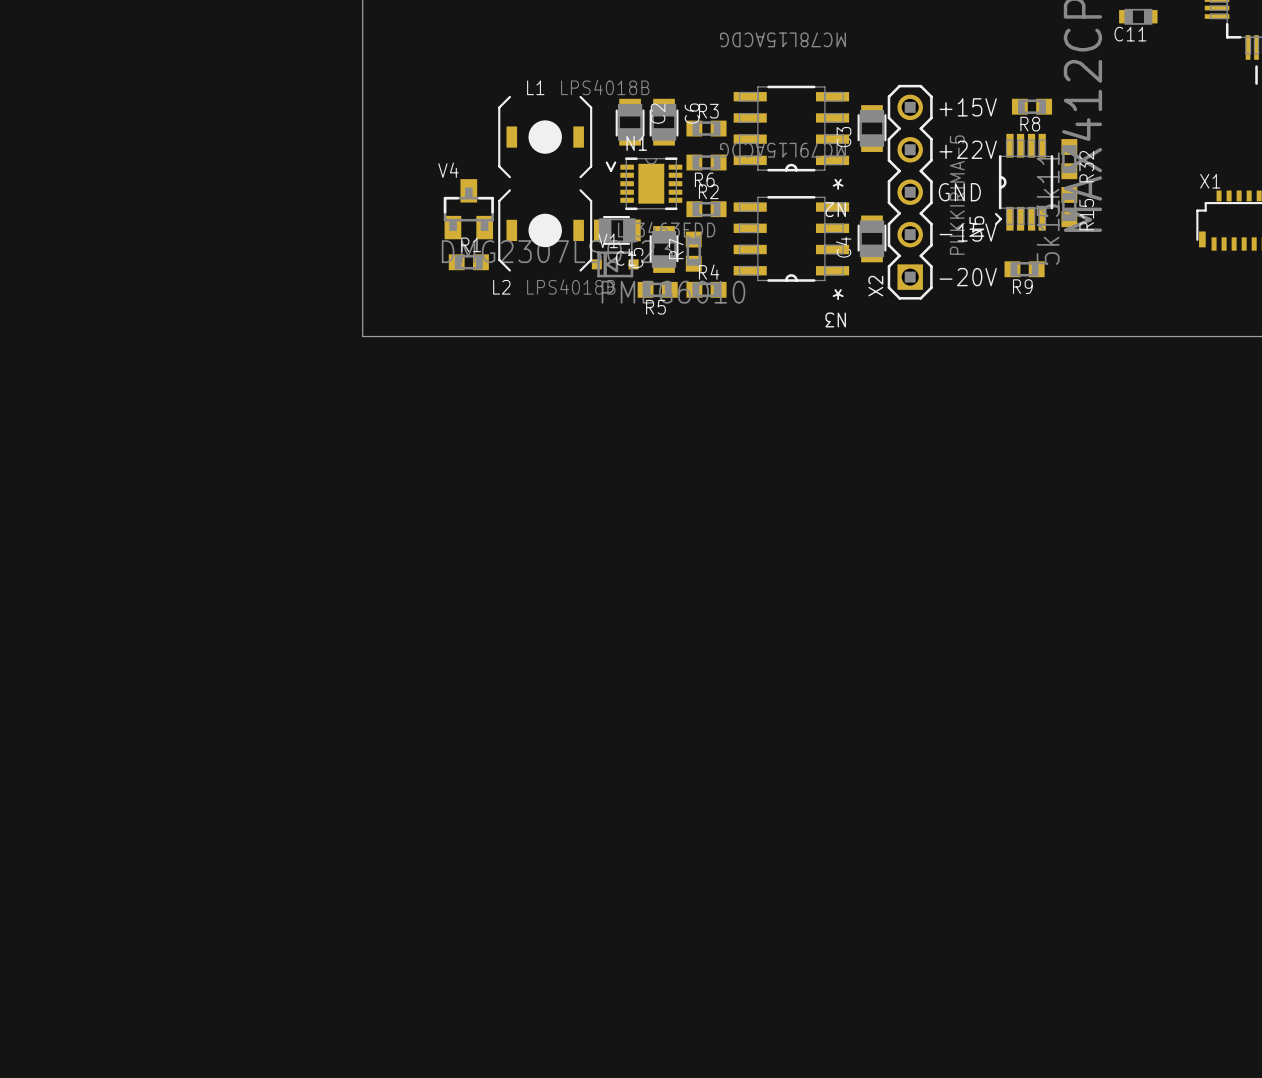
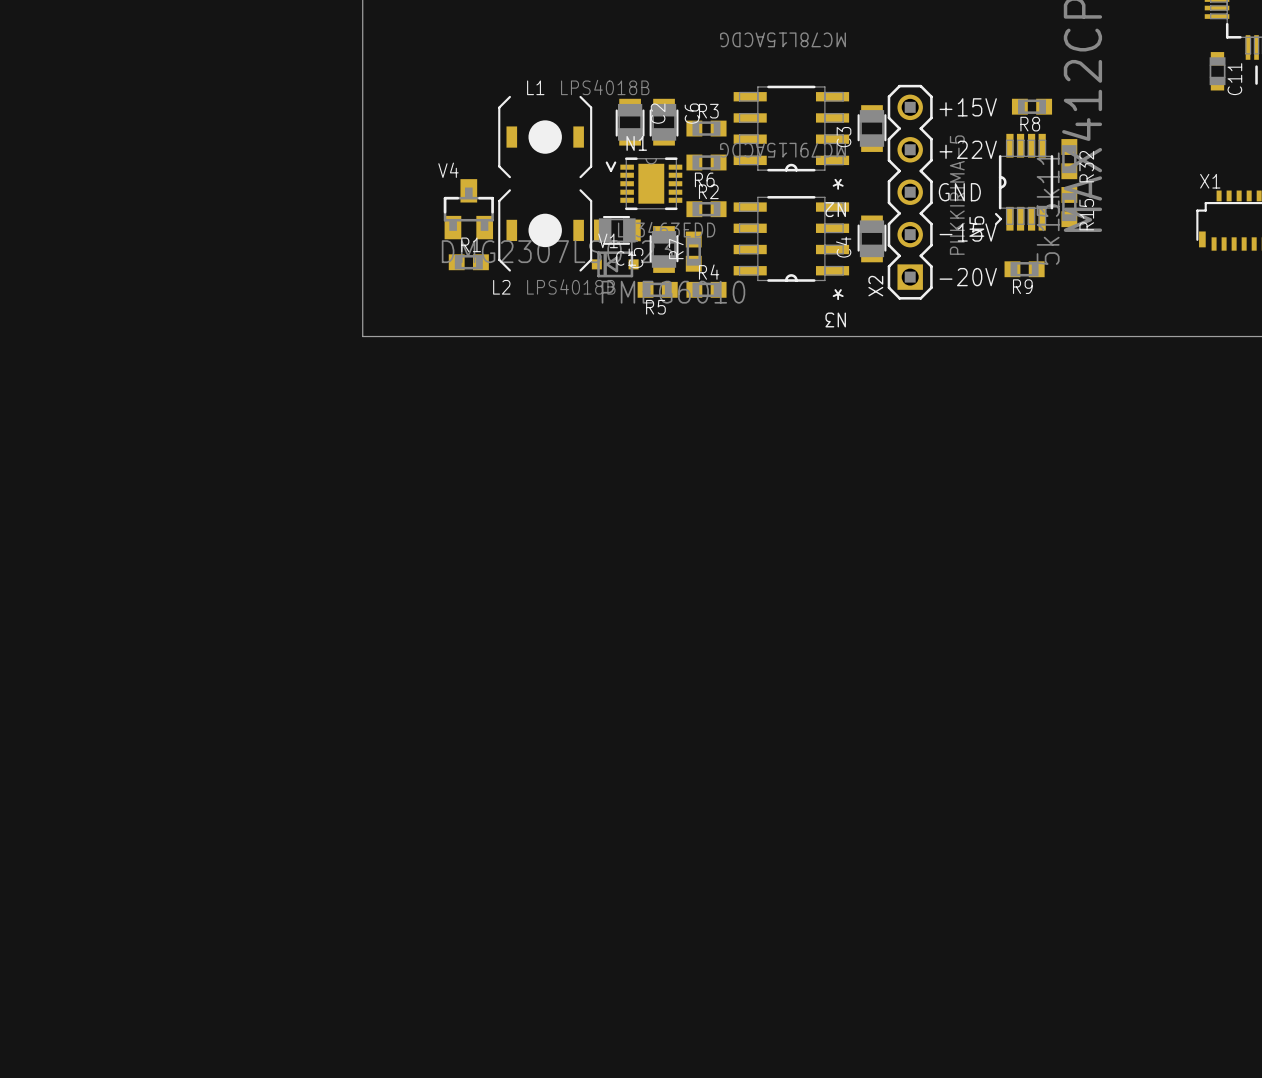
C11 rotation: 0° (1138, 16) -> 90° clockwise (1217, 71)
C11 position: (1138, 16) -> (1217, 71)

